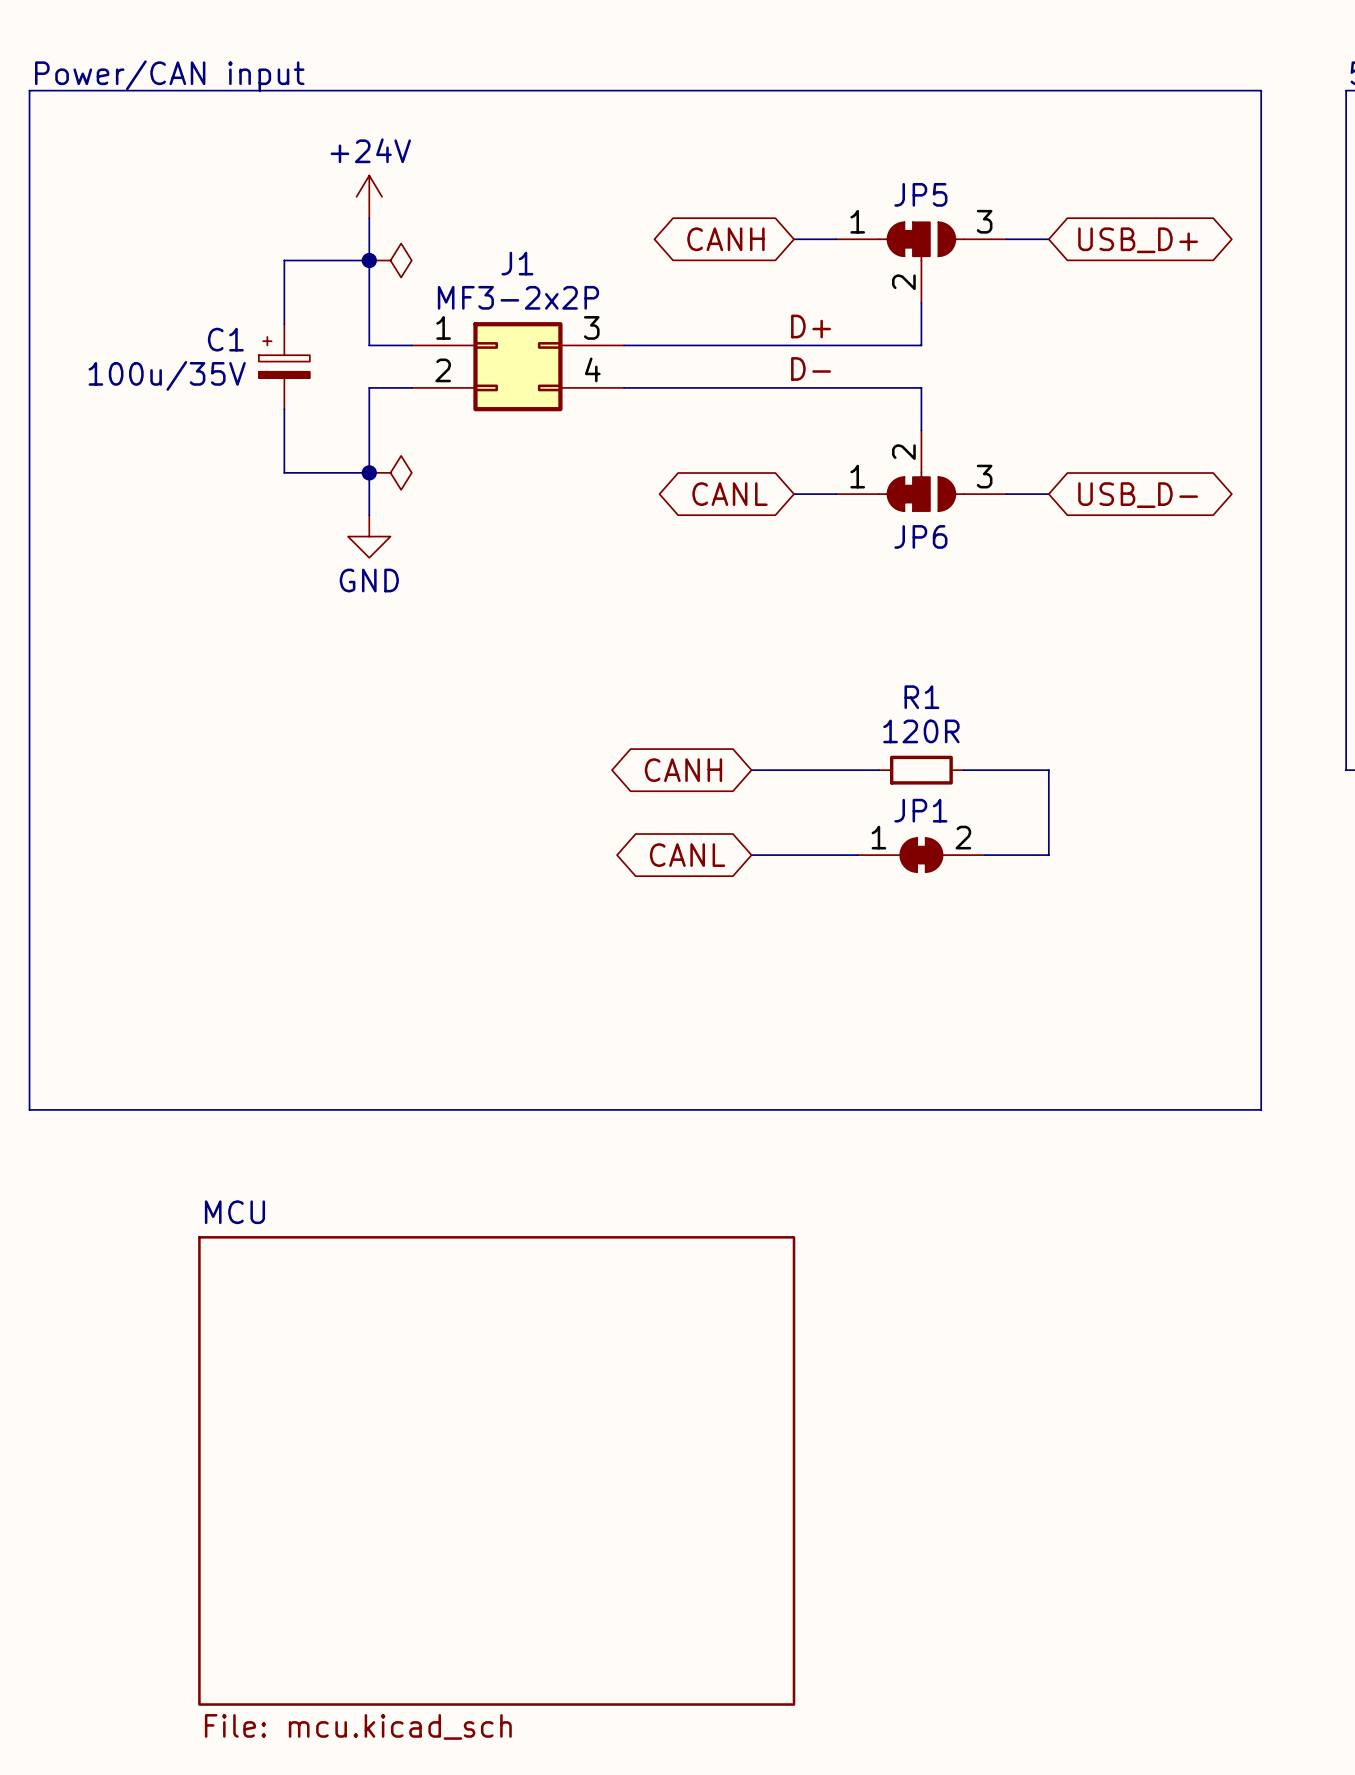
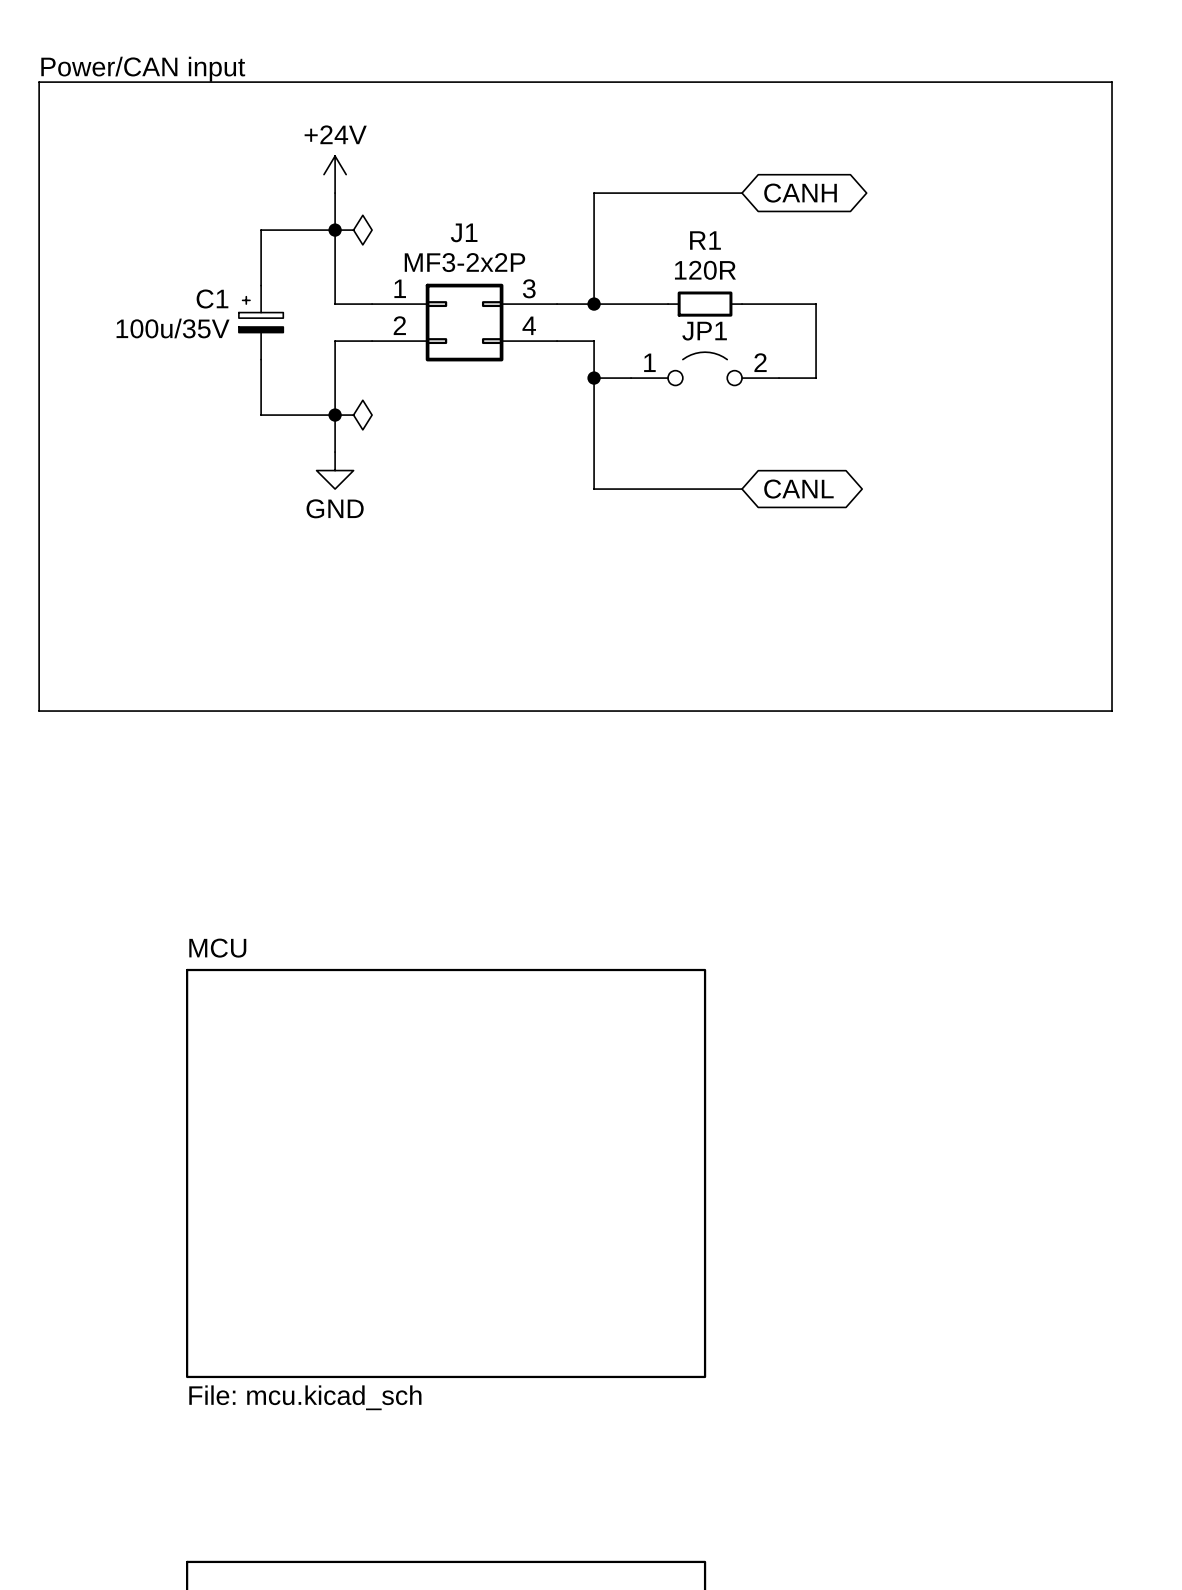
wire: none -> (742, 193) (594, 193) (594, 304)
global label rotation: 0° (725, 239) -> 180° (800, 193)
global label position: CANH (725, 239) -> CANH (800, 193)
wire: (794, 239) (836, 239) -> none
wire: (1006, 239) (1048, 239) -> none
global label: USB_D+ (1138, 240) -> none
JP5: (921, 262) -> none
wire: (921, 302) (921, 345) -> (816, 341) (816, 304)
label: D+ (811, 326) -> none
junction: none -> (594, 304)
wire: (751, 345) (836, 345) -> none
label: D- (811, 368) -> none
wire: (666, 387) (921, 387) -> (594, 341) (594, 489) (742, 489)
junction: none -> (594, 378)
JP6: (921, 470) -> none
global label rotation: 0° (730, 494) -> 180° (798, 489)
global label position: CANL (730, 494) -> CANL (798, 489)
wire: (794, 494) (836, 494) -> (594, 378) (631, 378)
wire: (1006, 494) (1048, 494) -> (779, 378) (816, 378)
global label: USB_D- (1138, 495) -> none
global label: CANH (683, 770) -> none
wire: (751, 770) (878, 770) -> none
R1 position: (921, 770) -> (705, 304)
wire: (963, 770) (1048, 770) (1048, 855) (985, 855) -> none
line: (29, 812) (29, 1109) (1261, 1109) (1261, 812) -> (39, 711) (1112, 711)
JP1 symbol: [857, 838, 986, 873] -> [631, 352, 780, 386]
global label: CANL (687, 855) -> none
wire: (751, 855) (857, 855) -> none
sheet MCU position: (496, 1470) -> (446, 1173)

